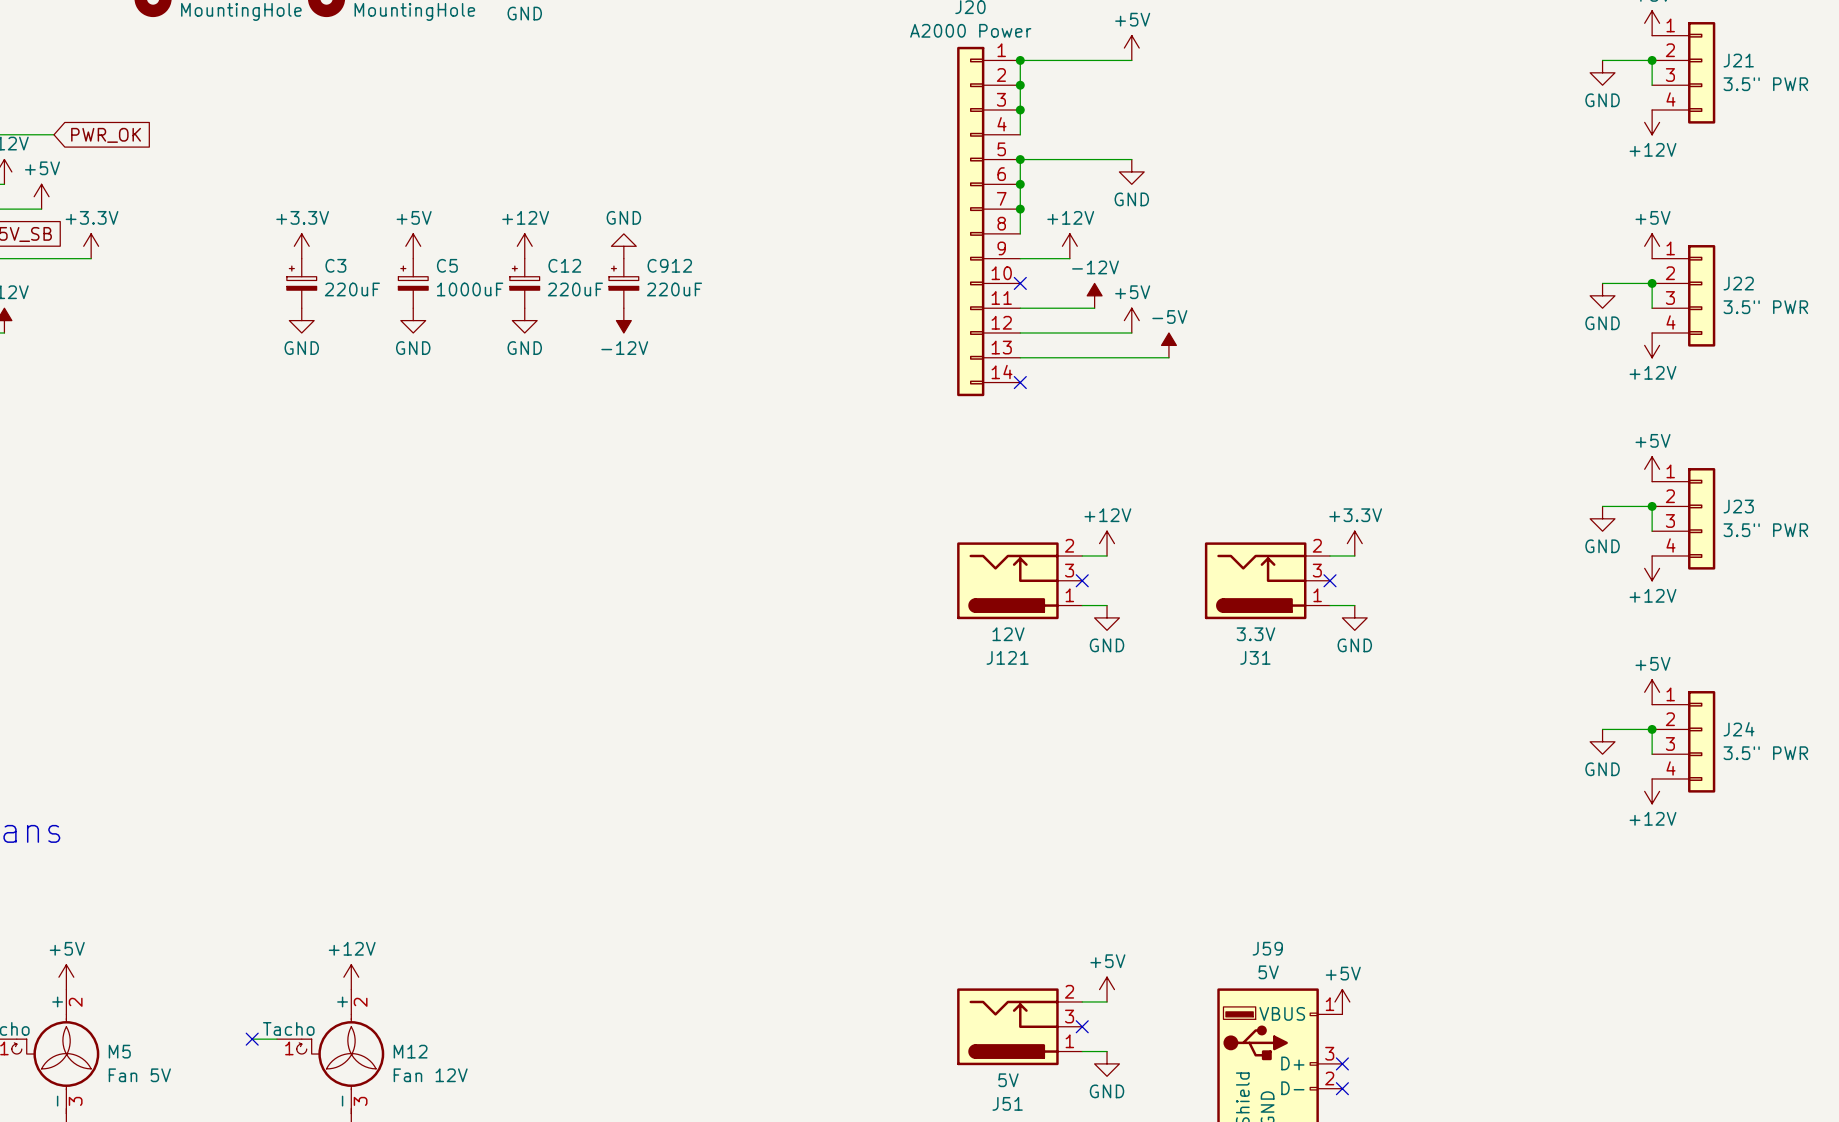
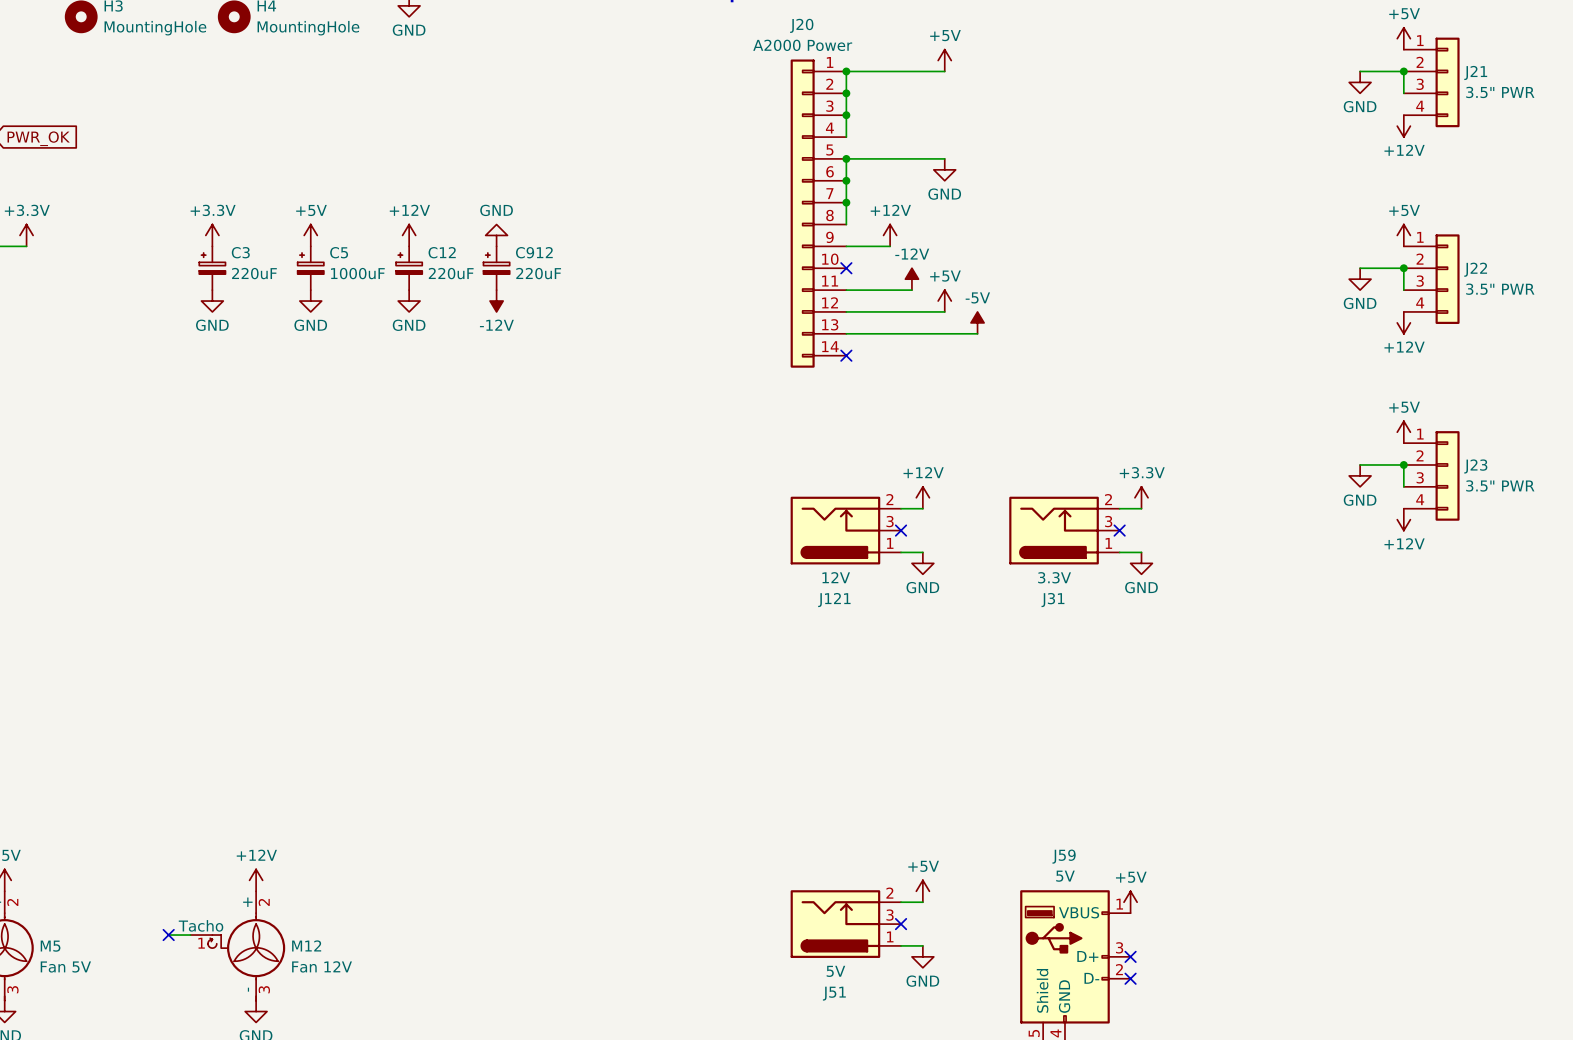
power symbol: +5V (1652, 692) -> none
wire: (1602, 729) (1652, 729) (1652, 754) -> none
junction: (1652, 729) -> none
power symbol: GND (1602, 741) -> none
J24: 3.5" PWR (1683, 741) -> none
power symbol: +12V (1652, 791) -> none

